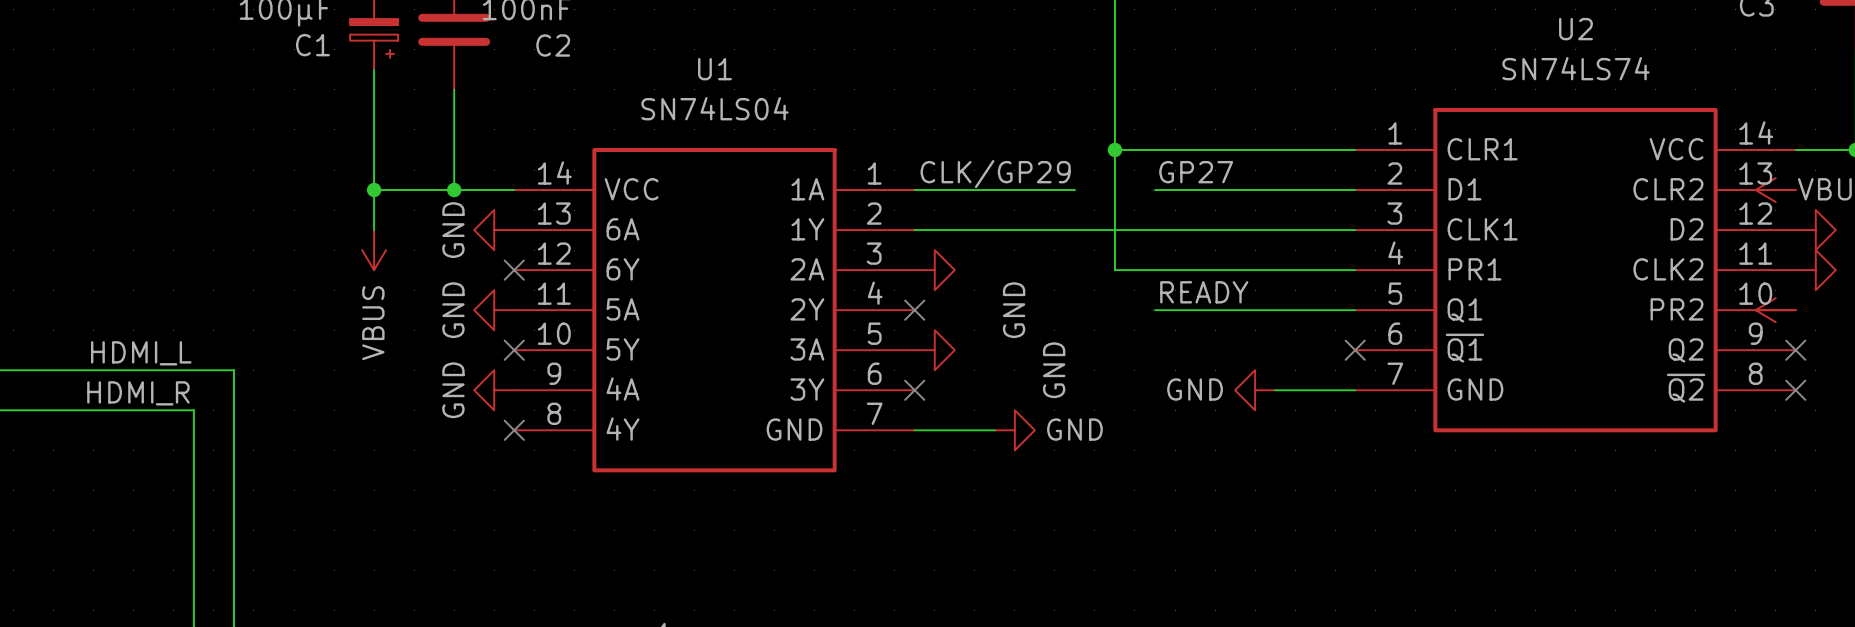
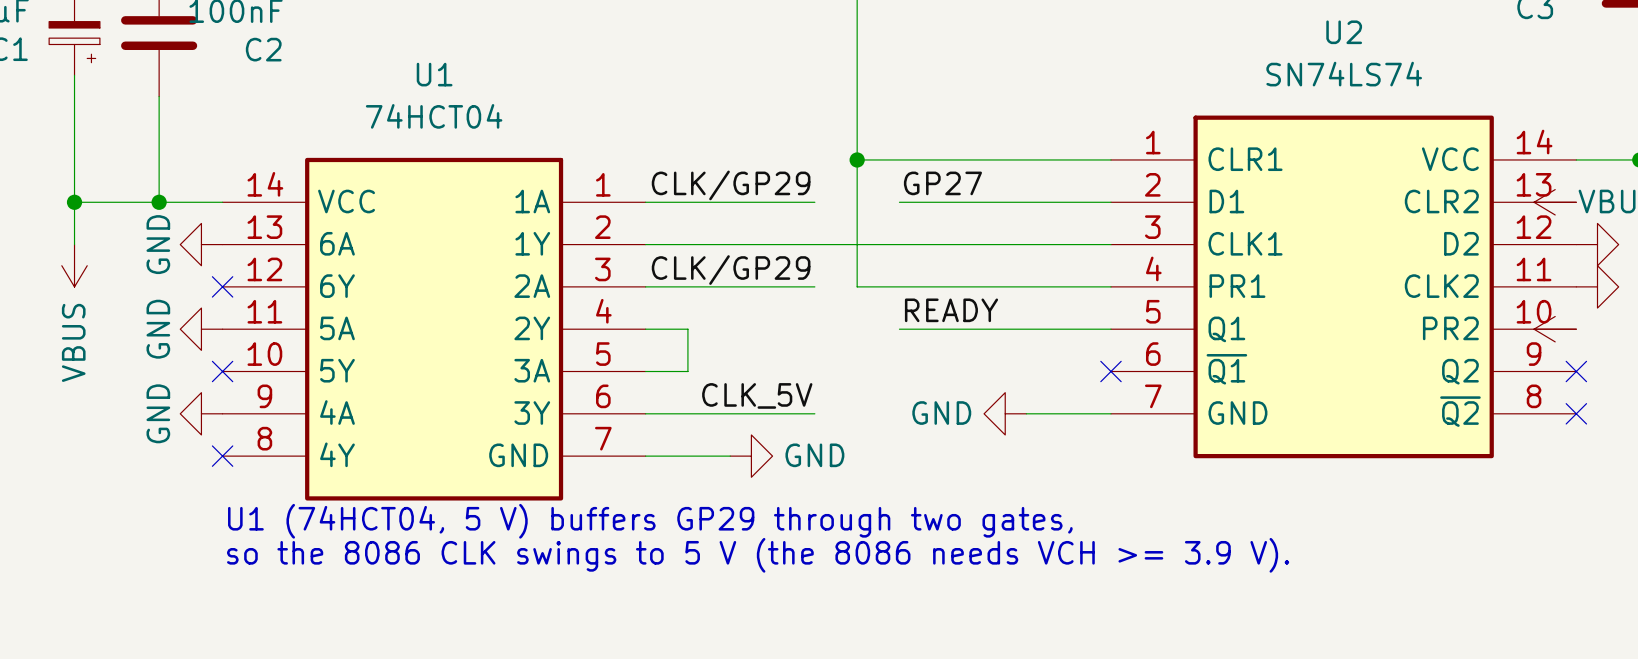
U1 value: SN74LS04 (714, 108) -> 74HCT04 (434, 116)
label: none -> CLK/GP29 (731, 270)
wire: none -> (645, 286) (814, 286)
power symbol: GND (934, 270) -> none
wire: none -> (645, 329) (687, 329) (687, 371) (645, 371)
no-connect mark: (914, 310) -> none
power symbol: GND (934, 350) -> none
label: none -> CLK_5V (757, 395)
wire: none -> (645, 413) (814, 413)
no-connect mark: (914, 390) -> none
text: none -> U1 (74HCT04, 5 V) buffers GP29 through two gates, (650, 521)
text: none -> so the 8086 CLK swings to 5 V (the 8086 needs VCH >= 3.9 V). (758, 555)

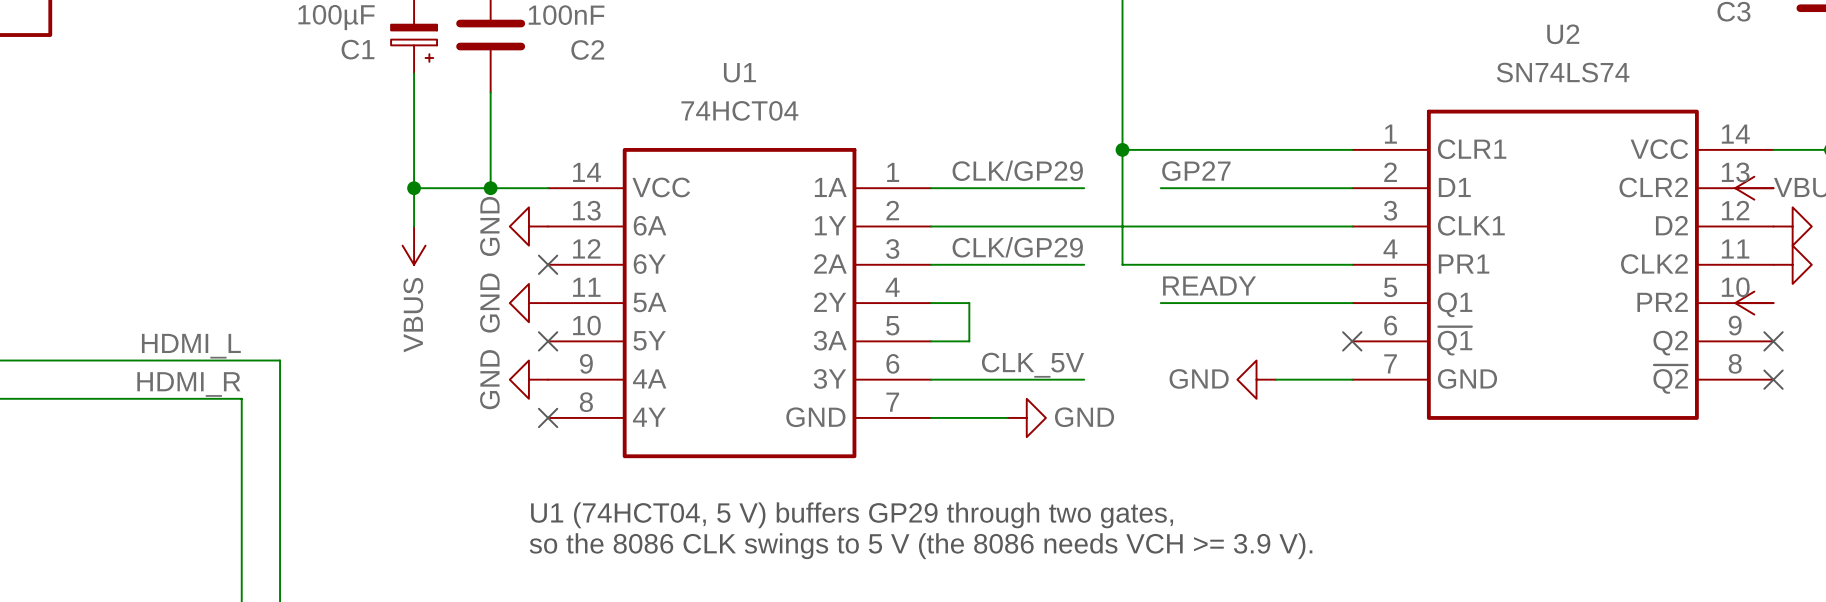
text position: U1 (74HCT04, 5 V) buffers GP29 through two gates, (650, 521) -> U1 (74HCT04, 5 V) buffers GP29 through two gates, (852, 515)
text position: so the 8086 CLK swings to 5 V (the 8086 needs VCH >= 3.9 V). (758, 555) -> so the 8086 CLK swings to 5 V (the 8086 needs VCH >= 3.9 V). (921, 546)

